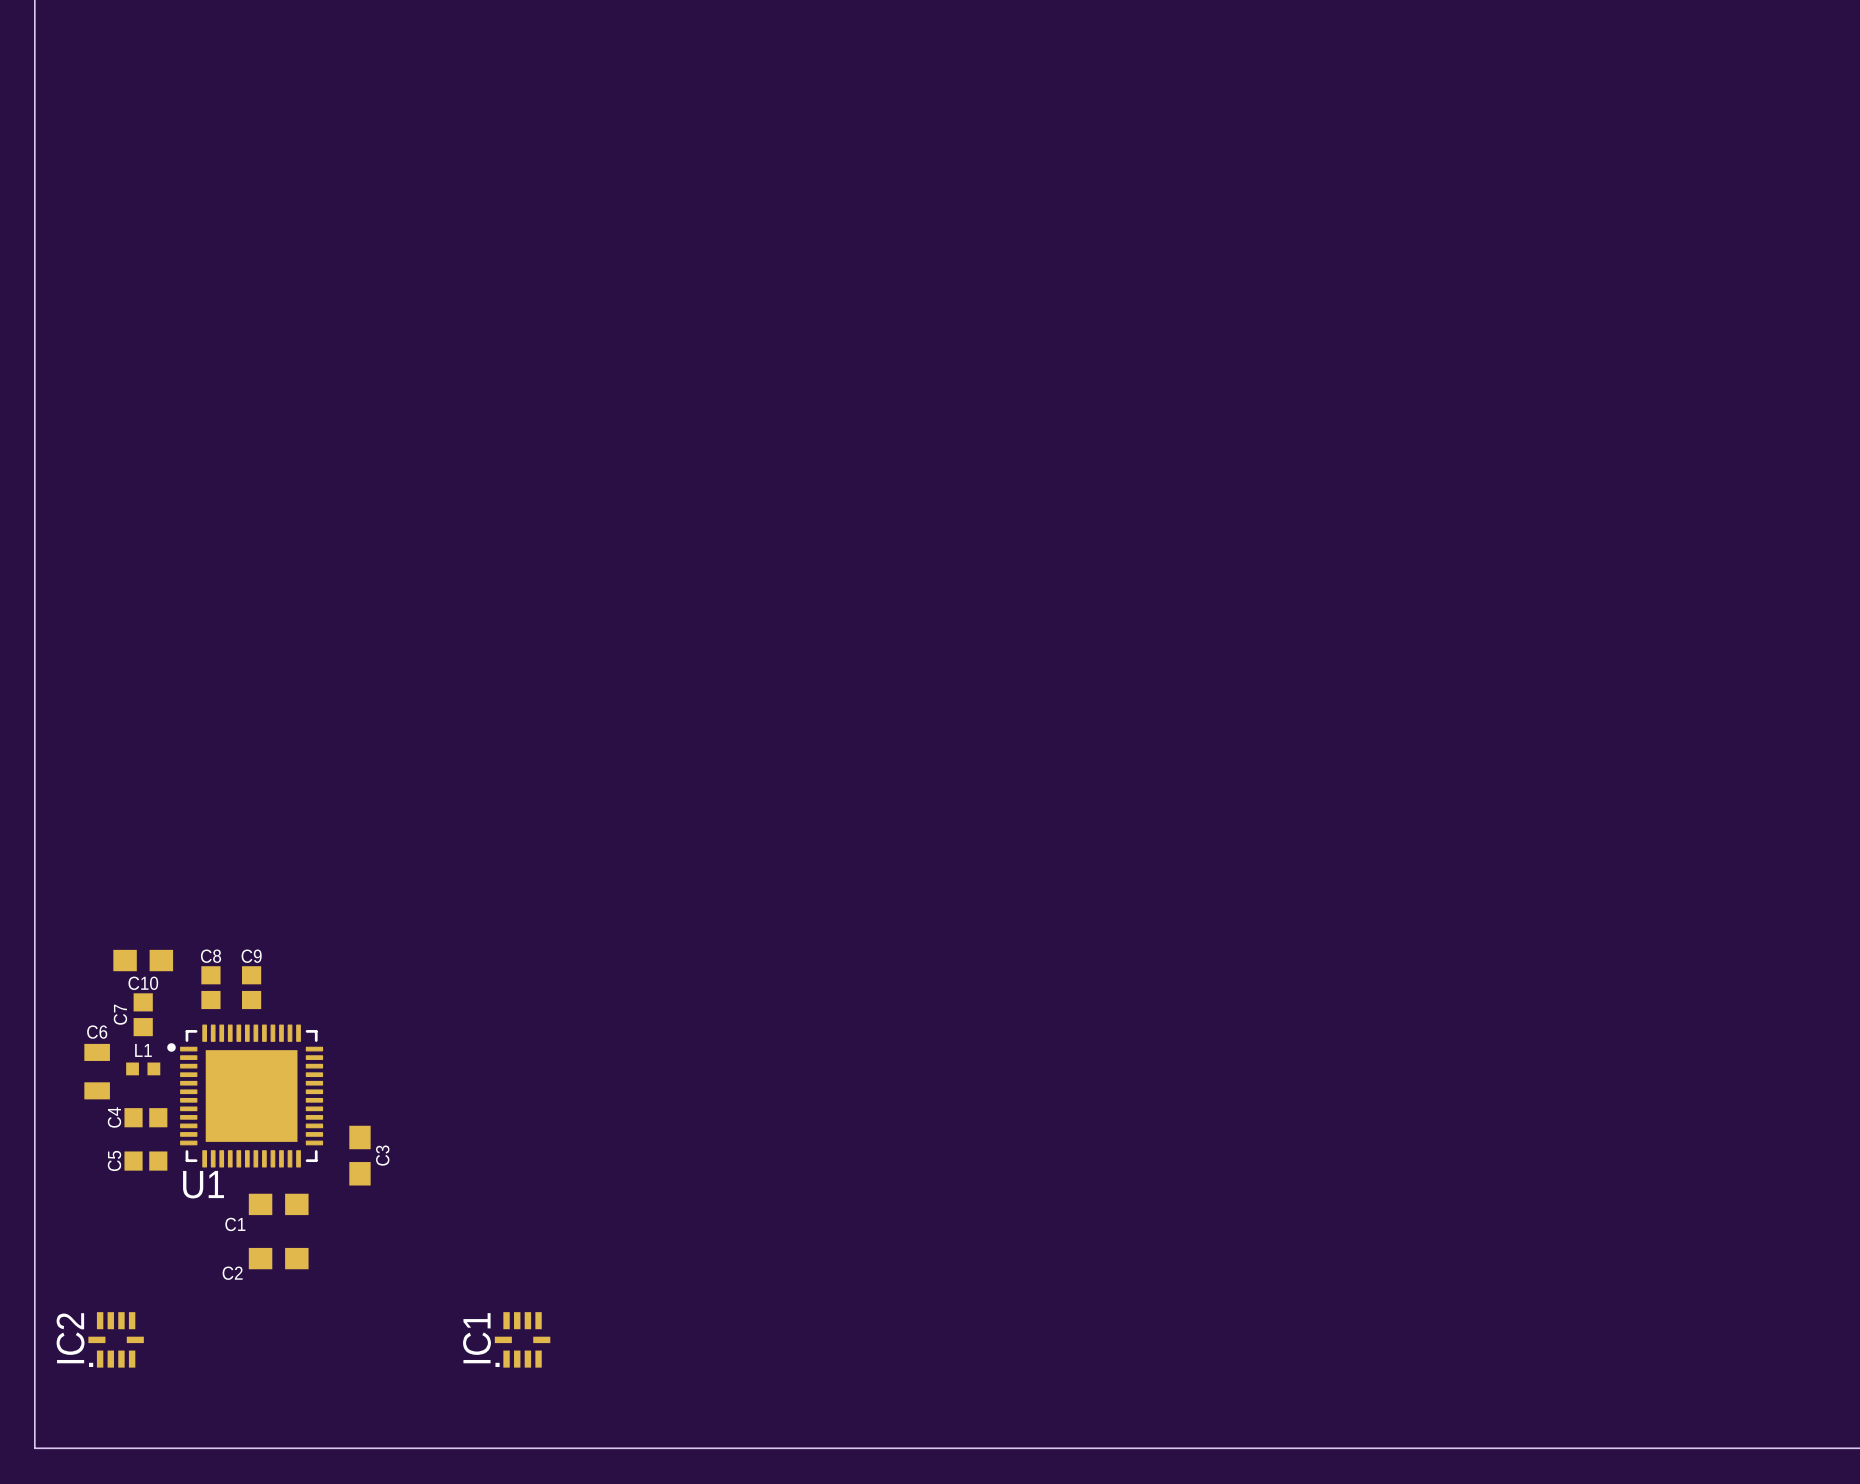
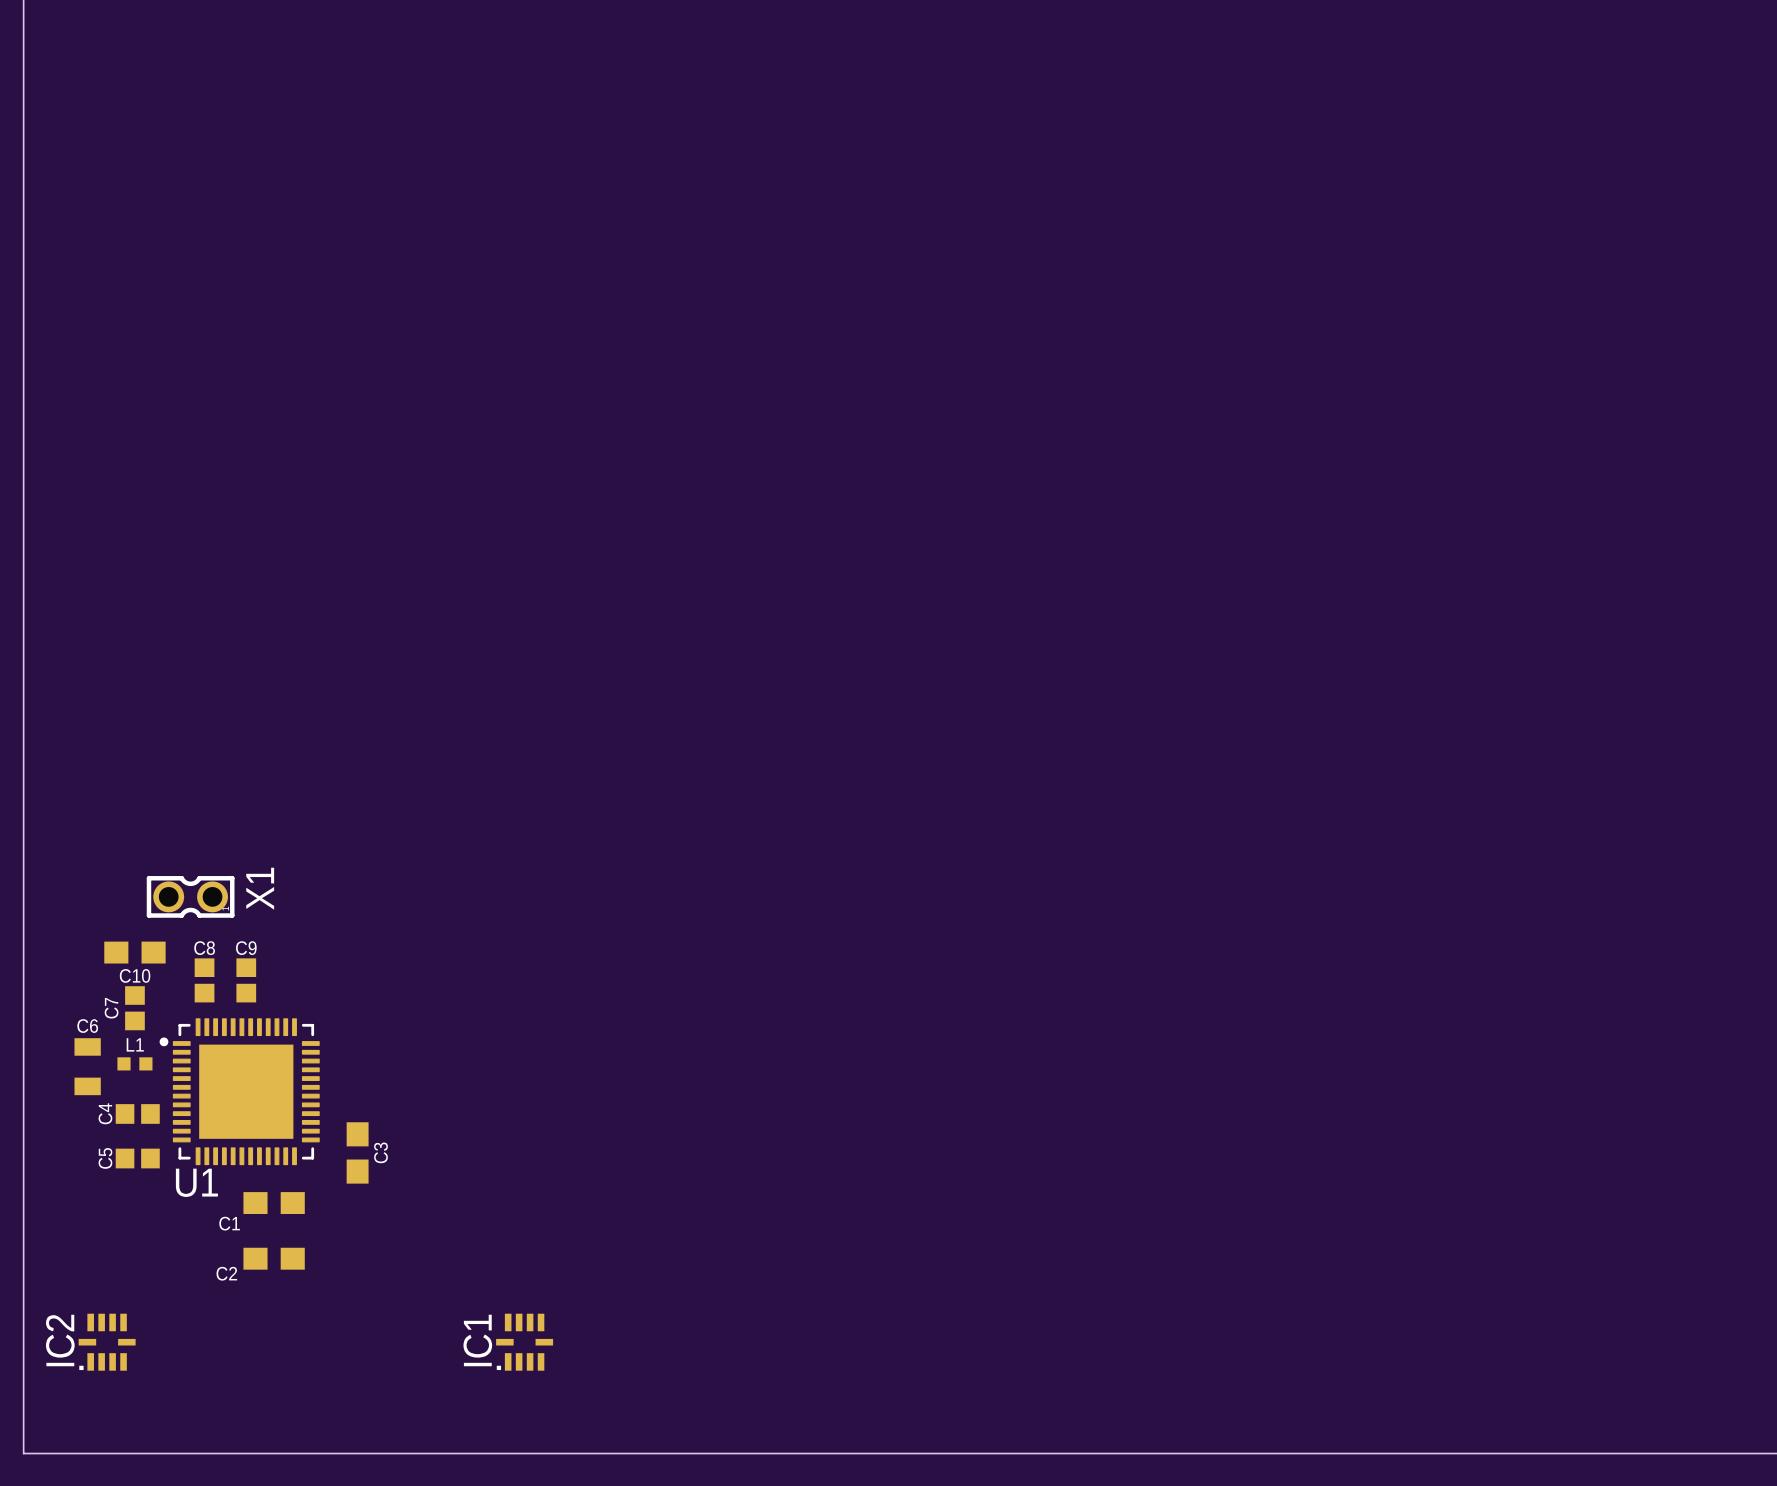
X1: none -> (190, 896)

